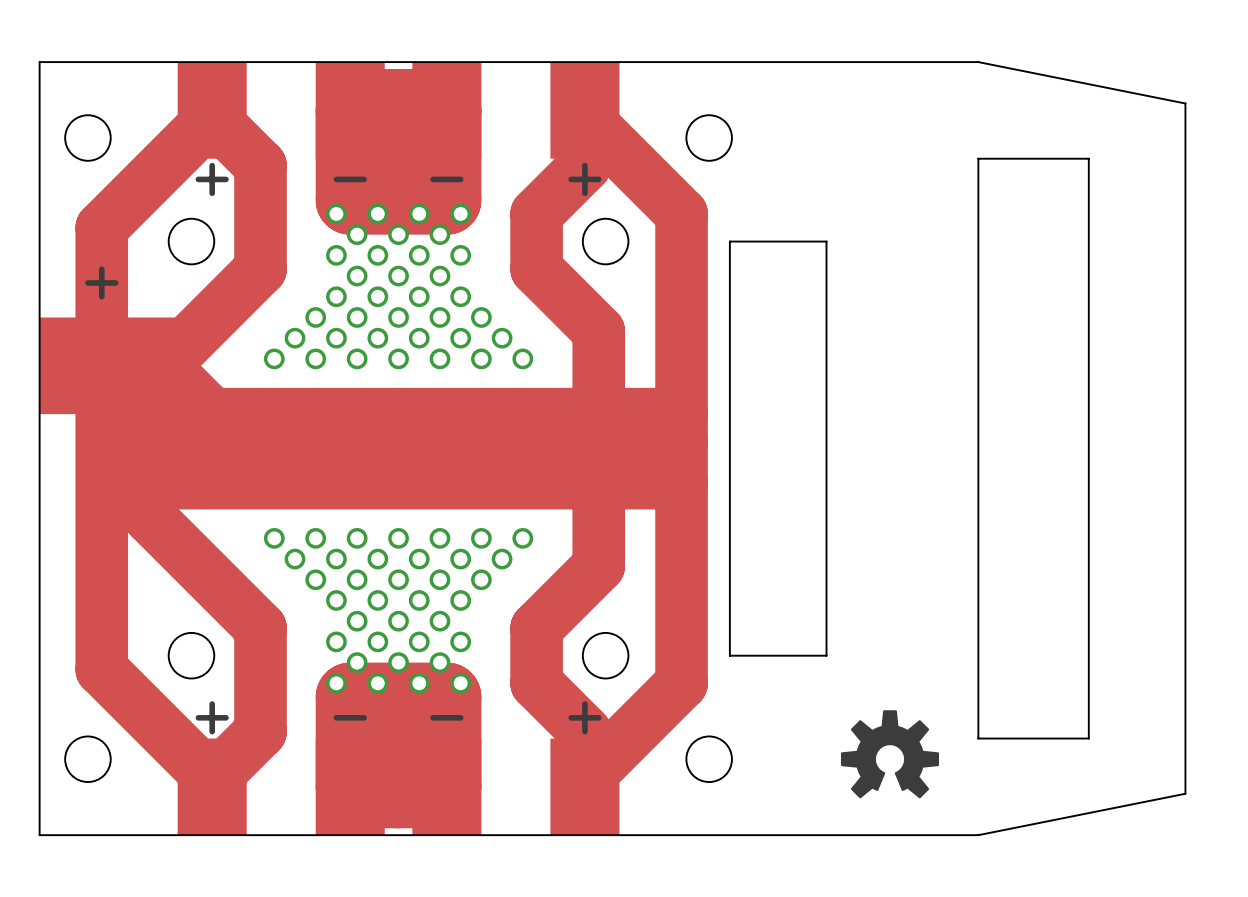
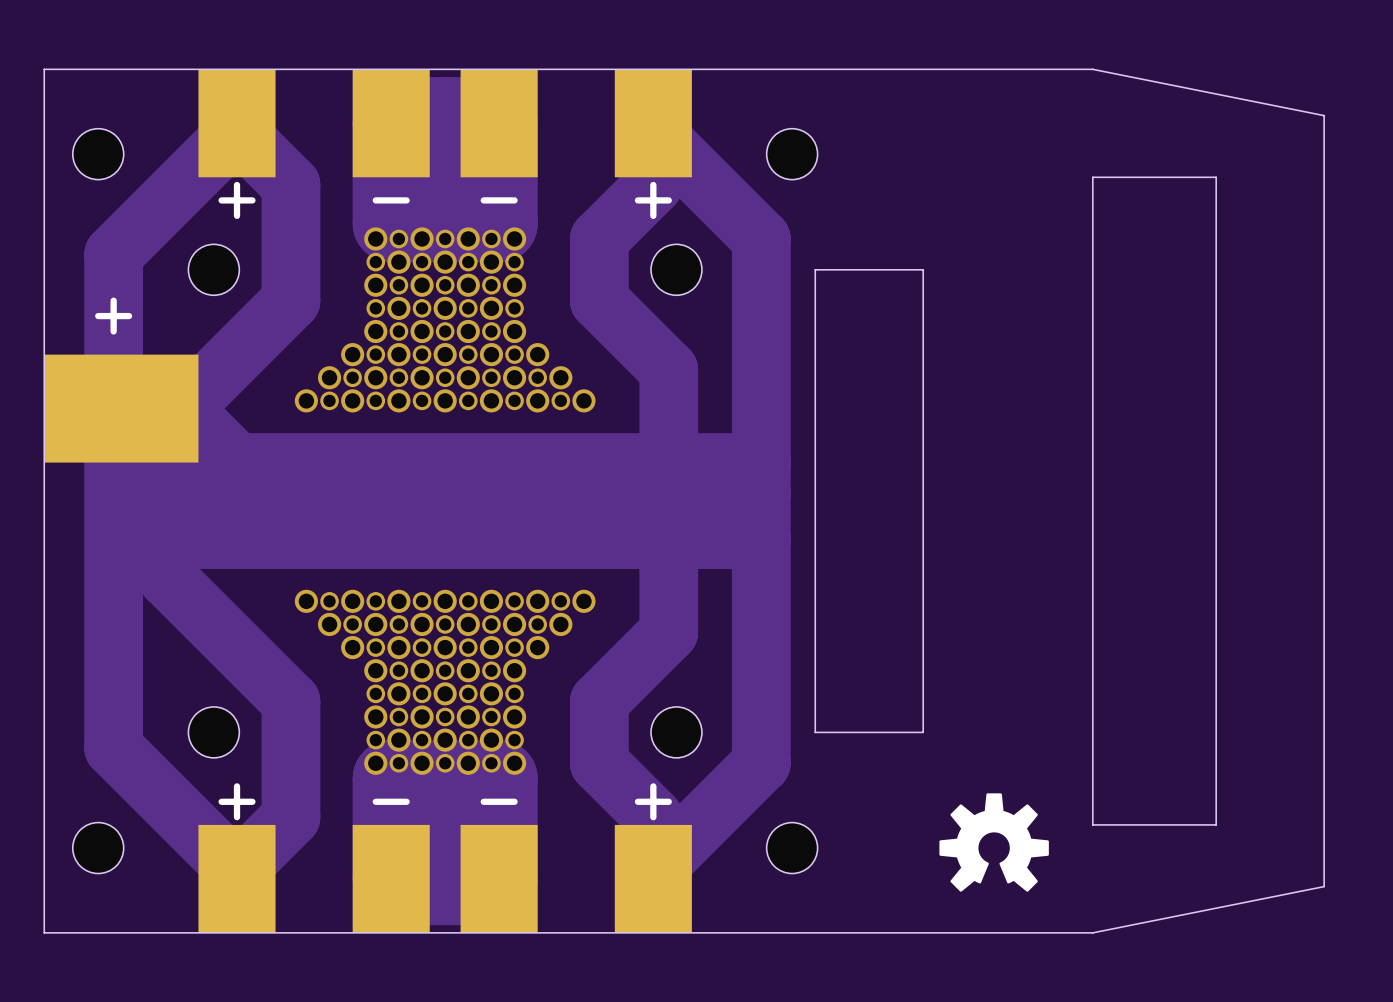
via: none -> (398, 238)
via: none -> (445, 238)
via: none -> (491, 238)
via: none -> (375, 262)
via: none -> (422, 262)
via: none -> (468, 262)
via: none -> (514, 262)
via: none -> (398, 285)
via: none -> (445, 285)
via: none -> (491, 285)
via: none -> (375, 308)
via: none -> (422, 308)
via: none -> (468, 308)
via: none -> (514, 308)
via: none -> (398, 331)
via: none -> (445, 331)
via: none -> (491, 331)
via: none -> (375, 354)
via: none -> (422, 354)
via: none -> (468, 354)
via: none -> (514, 354)
via: none -> (352, 377)
via: none -> (398, 377)
via: none -> (445, 377)
via: none -> (491, 377)
via: none -> (537, 377)
via: none -> (329, 400)
via: none -> (375, 400)
via: none -> (422, 400)
via: none -> (468, 400)
via: none -> (514, 400)
via: none -> (560, 400)
via: none -> (329, 601)
via: none -> (375, 601)
via: none -> (422, 601)
via: none -> (468, 601)
via: none -> (514, 601)
via: none -> (560, 601)
via: none -> (352, 624)
via: none -> (398, 624)
via: none -> (445, 624)
via: none -> (491, 624)
via: none -> (537, 624)
via: none -> (375, 647)
via: none -> (422, 647)
via: none -> (468, 647)
via: none -> (514, 647)
via: none -> (398, 670)
via: none -> (445, 670)
via: none -> (491, 670)
via: none -> (375, 693)
via: none -> (422, 693)
via: none -> (468, 693)
via: none -> (514, 693)
via: none -> (398, 716)
via: none -> (445, 716)
via: none -> (491, 716)
via: none -> (375, 740)
via: none -> (422, 740)
via: none -> (468, 740)
via: none -> (514, 740)
via: none -> (398, 763)
via: none -> (445, 763)
via: none -> (491, 763)

